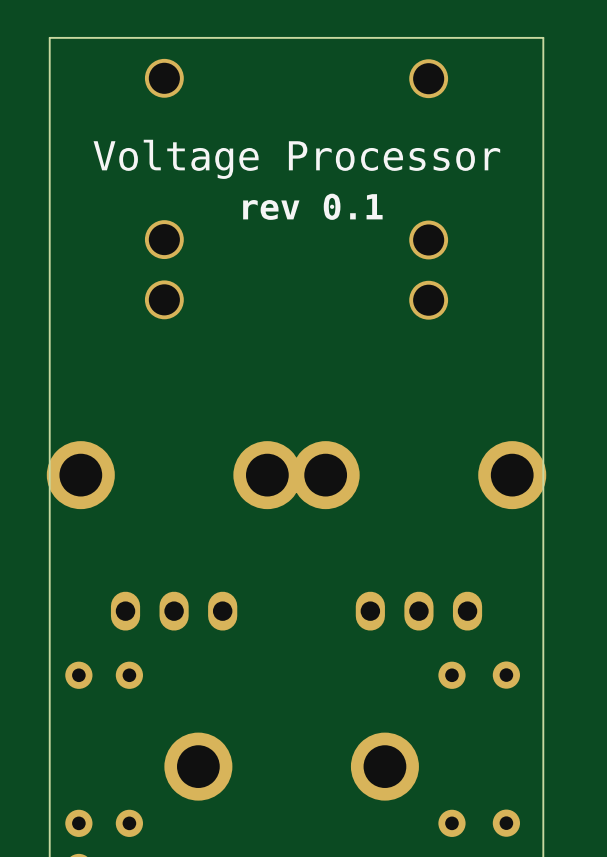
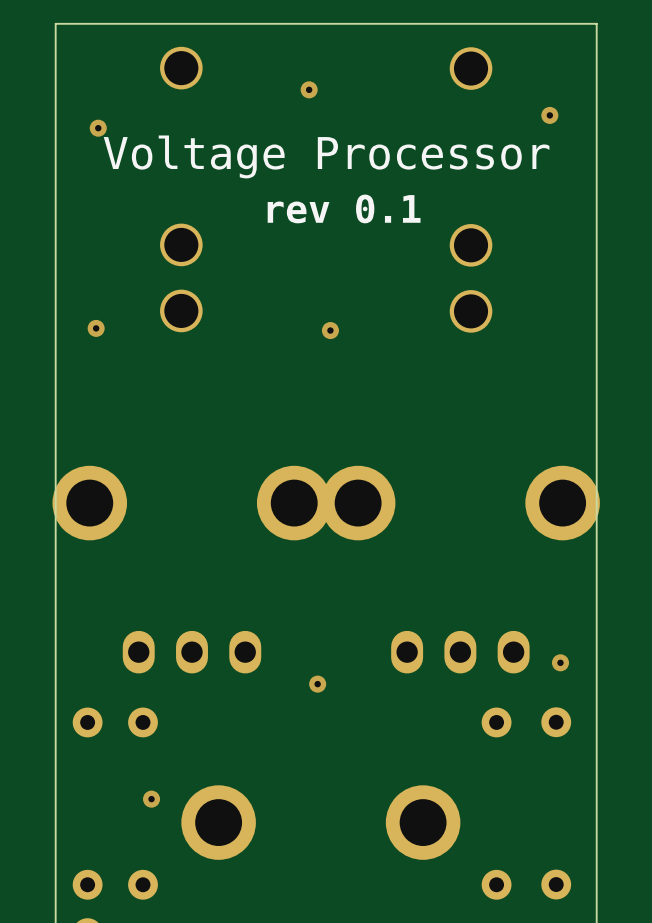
via: none -> (309, 89)
via: none -> (549, 115)
via: none -> (98, 128)
via: none -> (96, 328)
via: none -> (330, 330)
via: none -> (560, 662)
via: none -> (317, 684)
via: none -> (151, 799)

